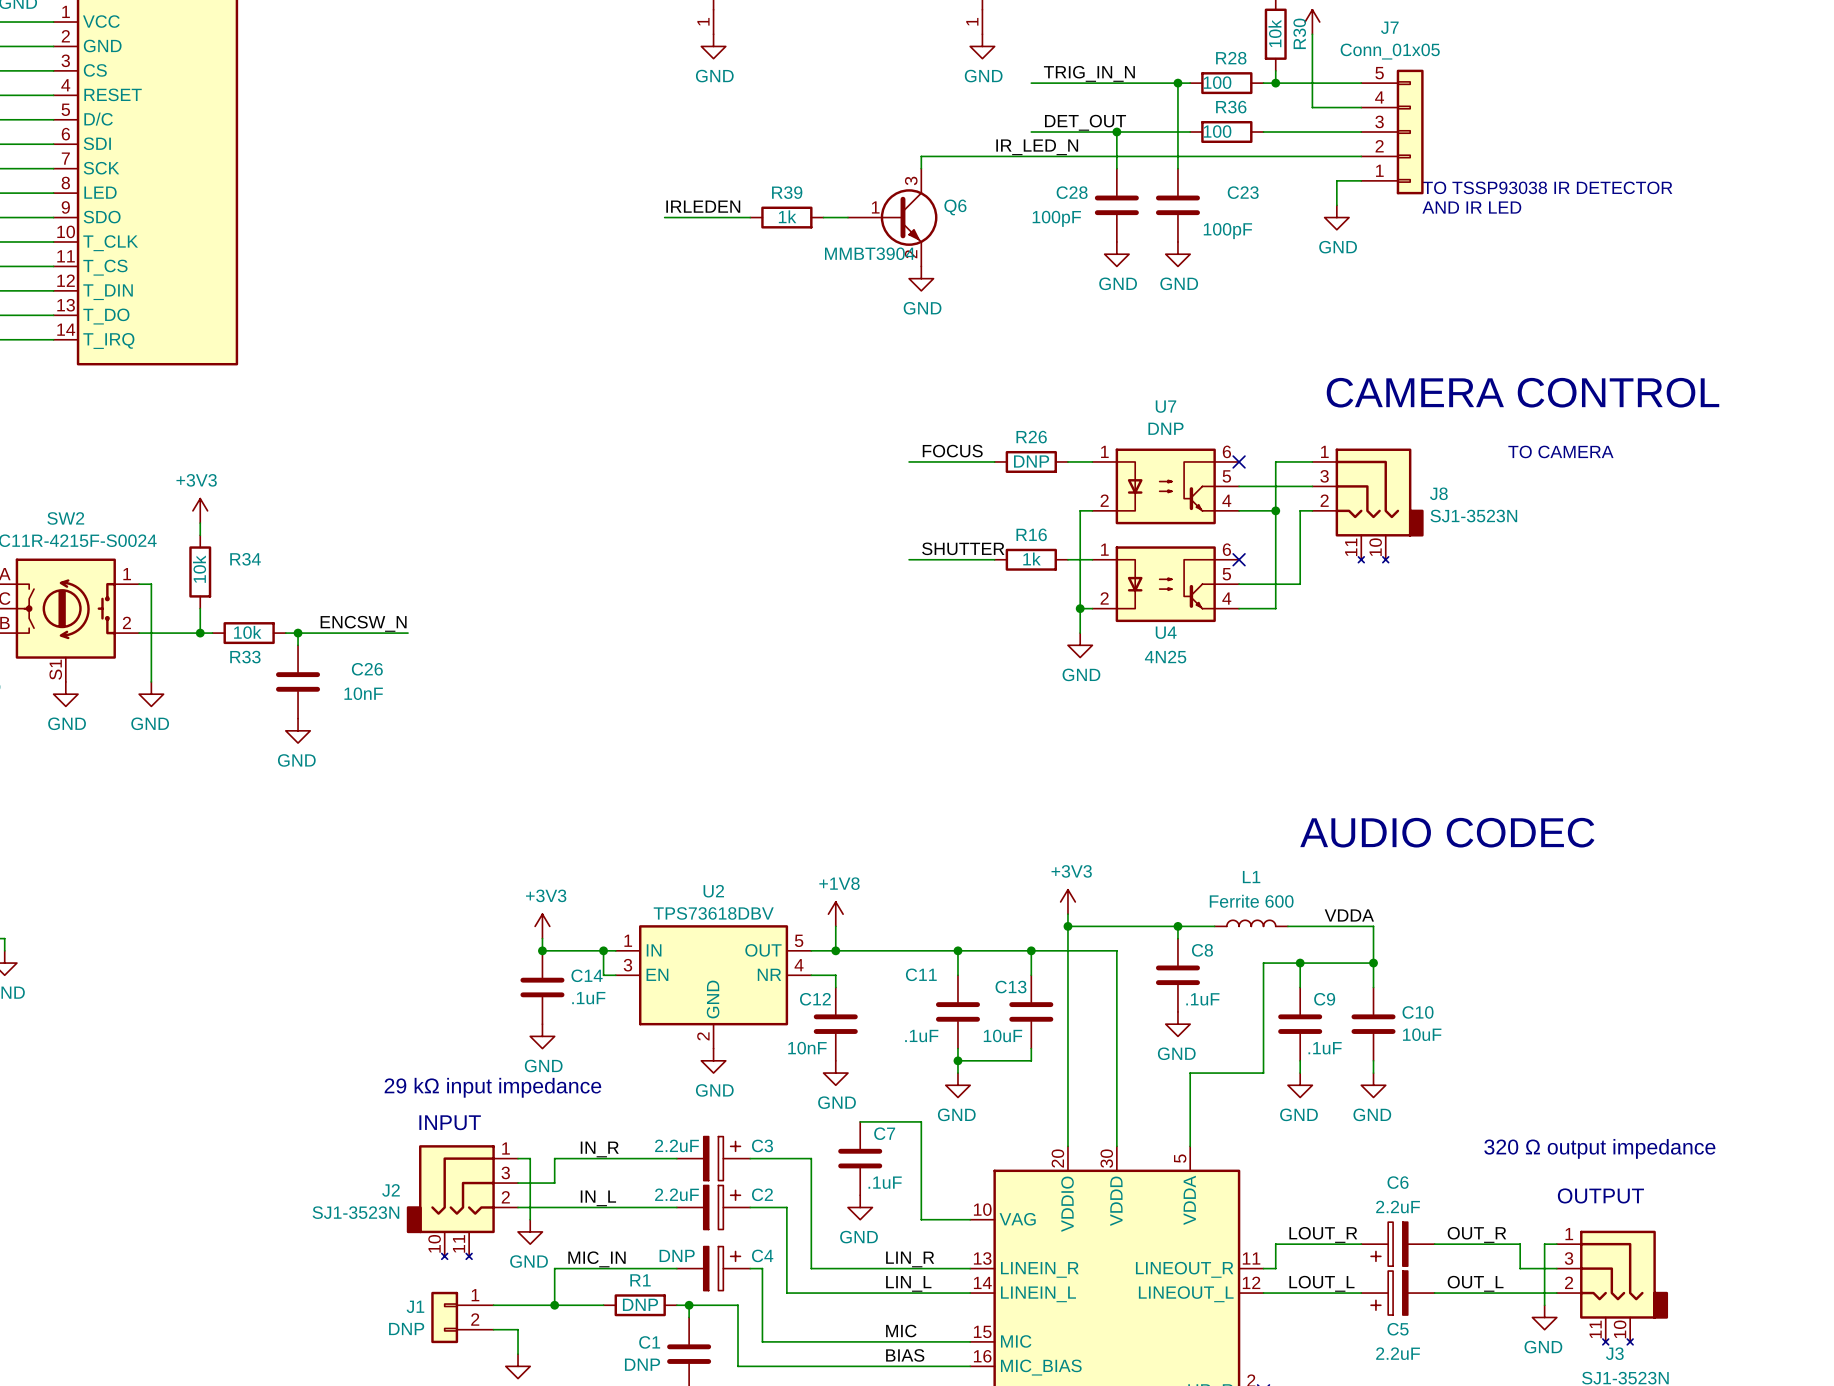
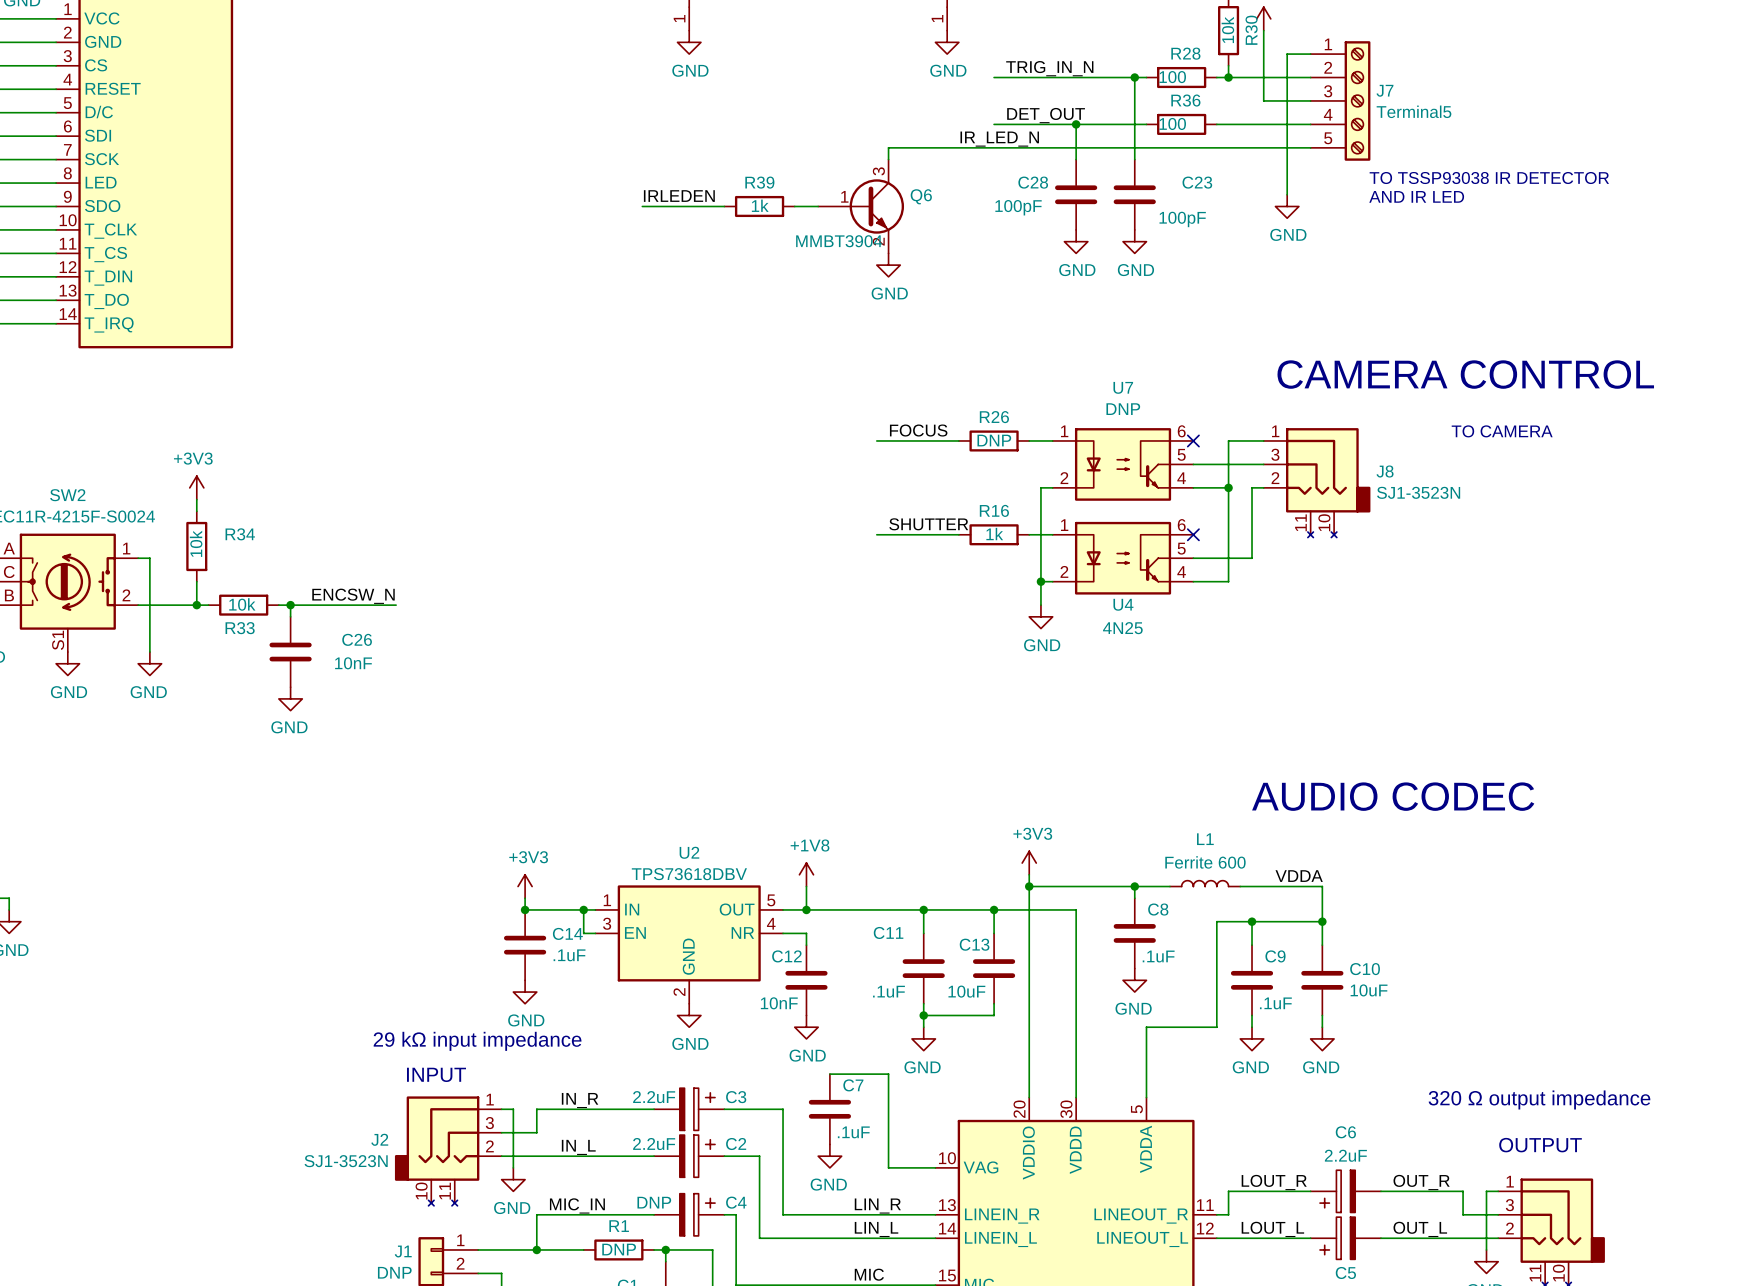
J7 name position: J7 (1389, 27) -> J7 (1384, 90)
J7 value: Conn_01x05 (1390, 51) -> Terminal5 (1414, 111)
J7 symbol: [1361, 69, 1424, 195] -> [1310, 41, 1371, 161]
wire: (1336, 180) (1361, 180) -> (1287, 171) (1287, 54) (1310, 54)

